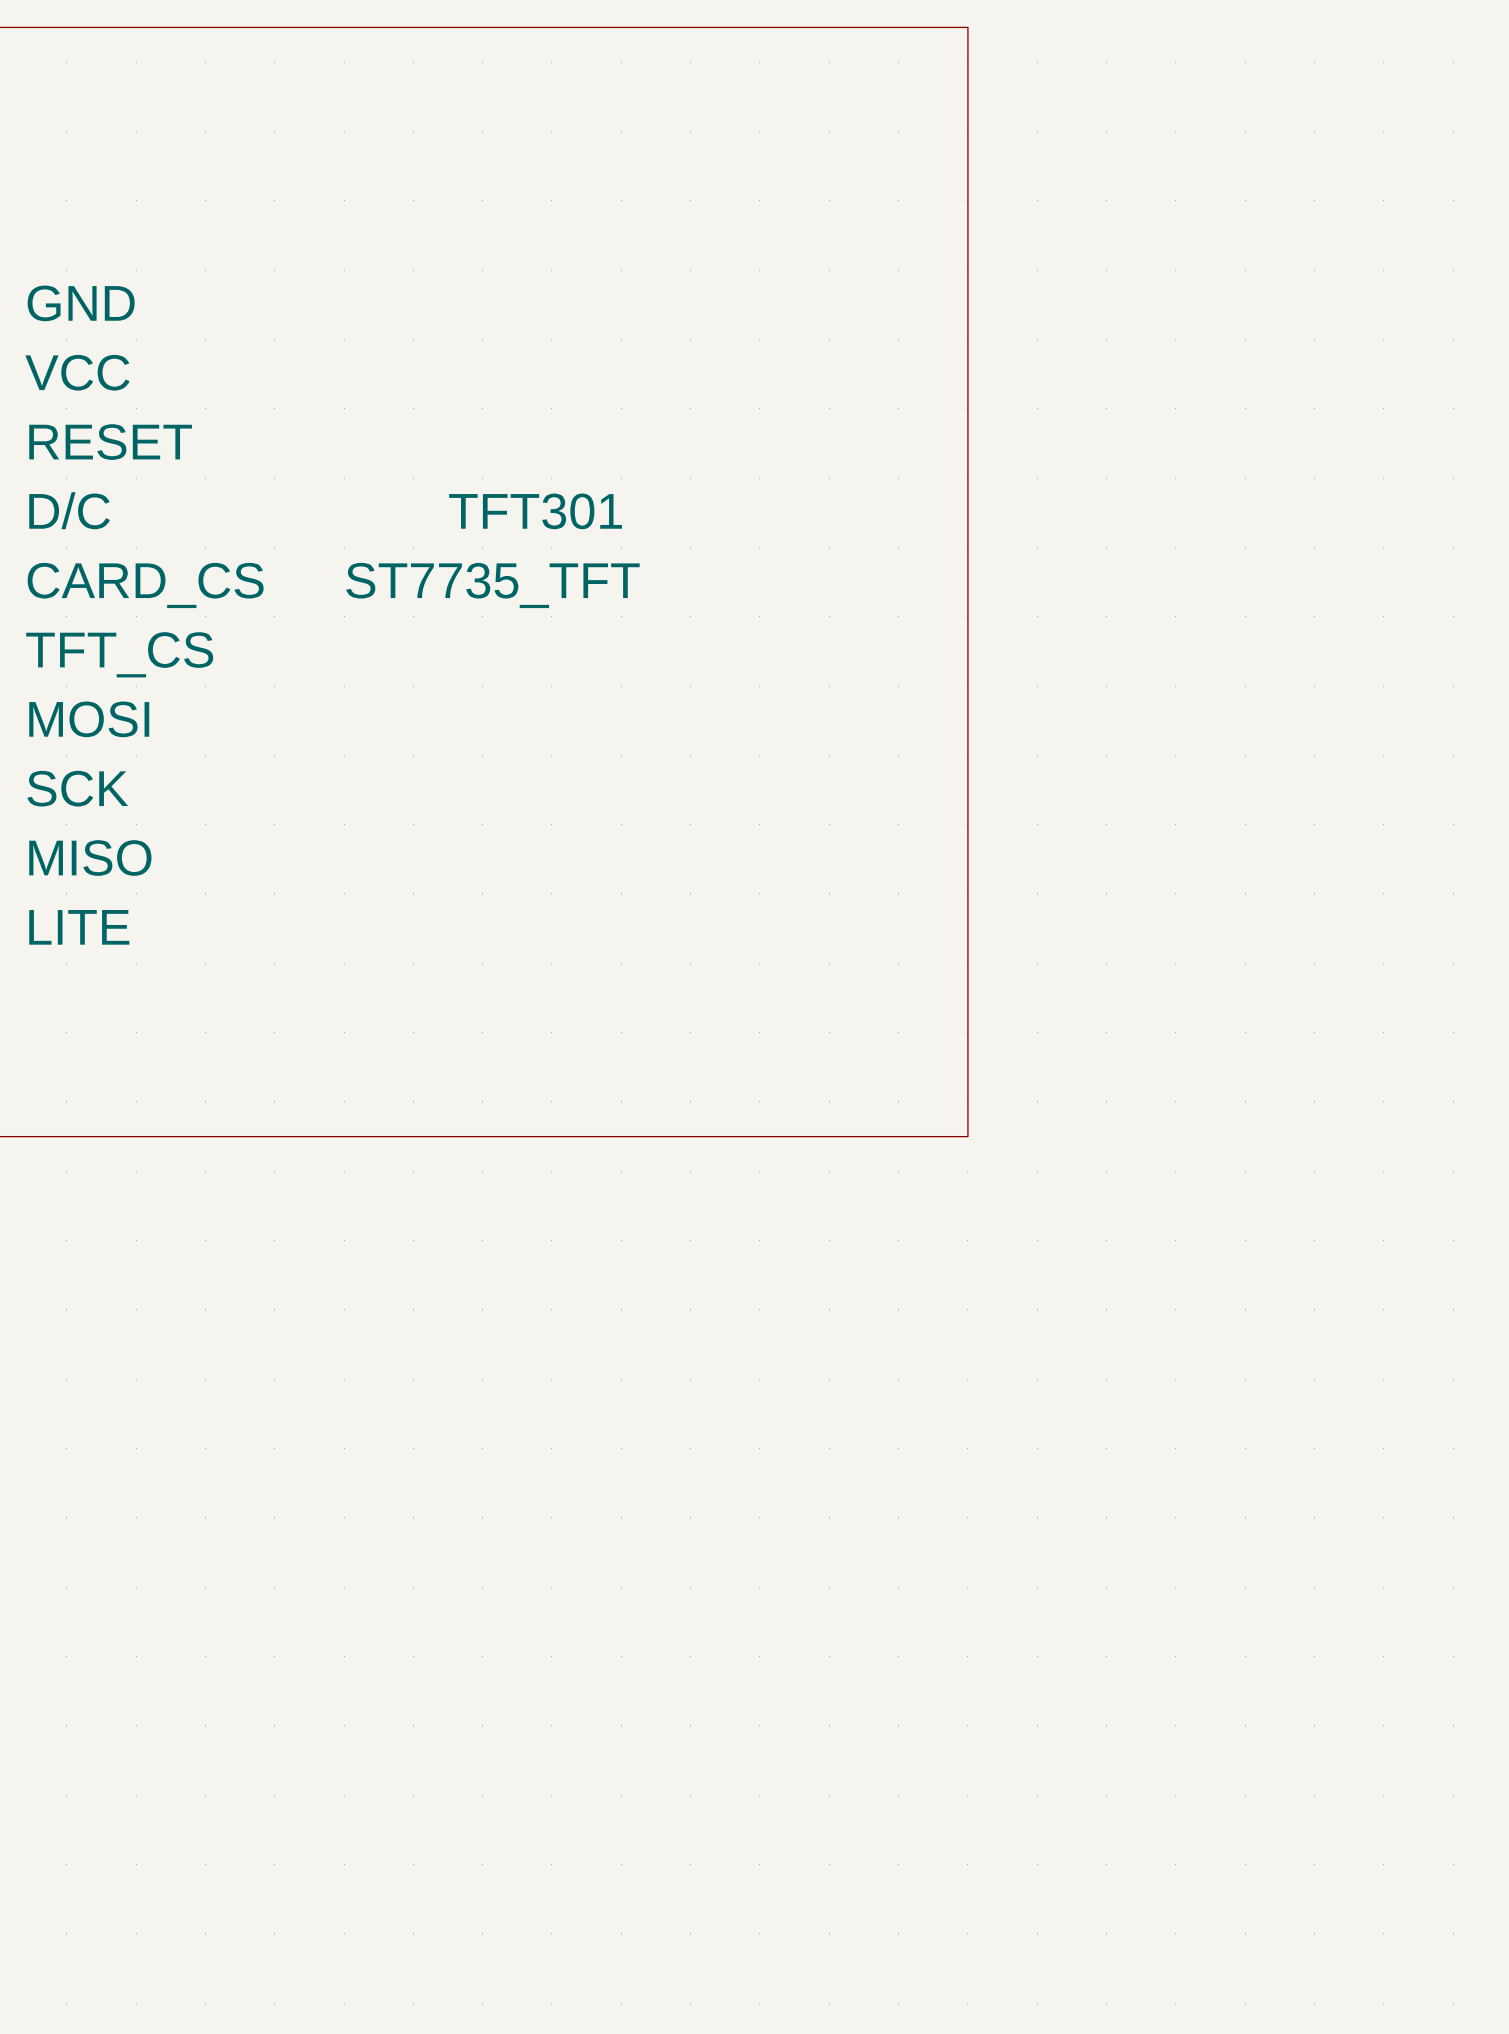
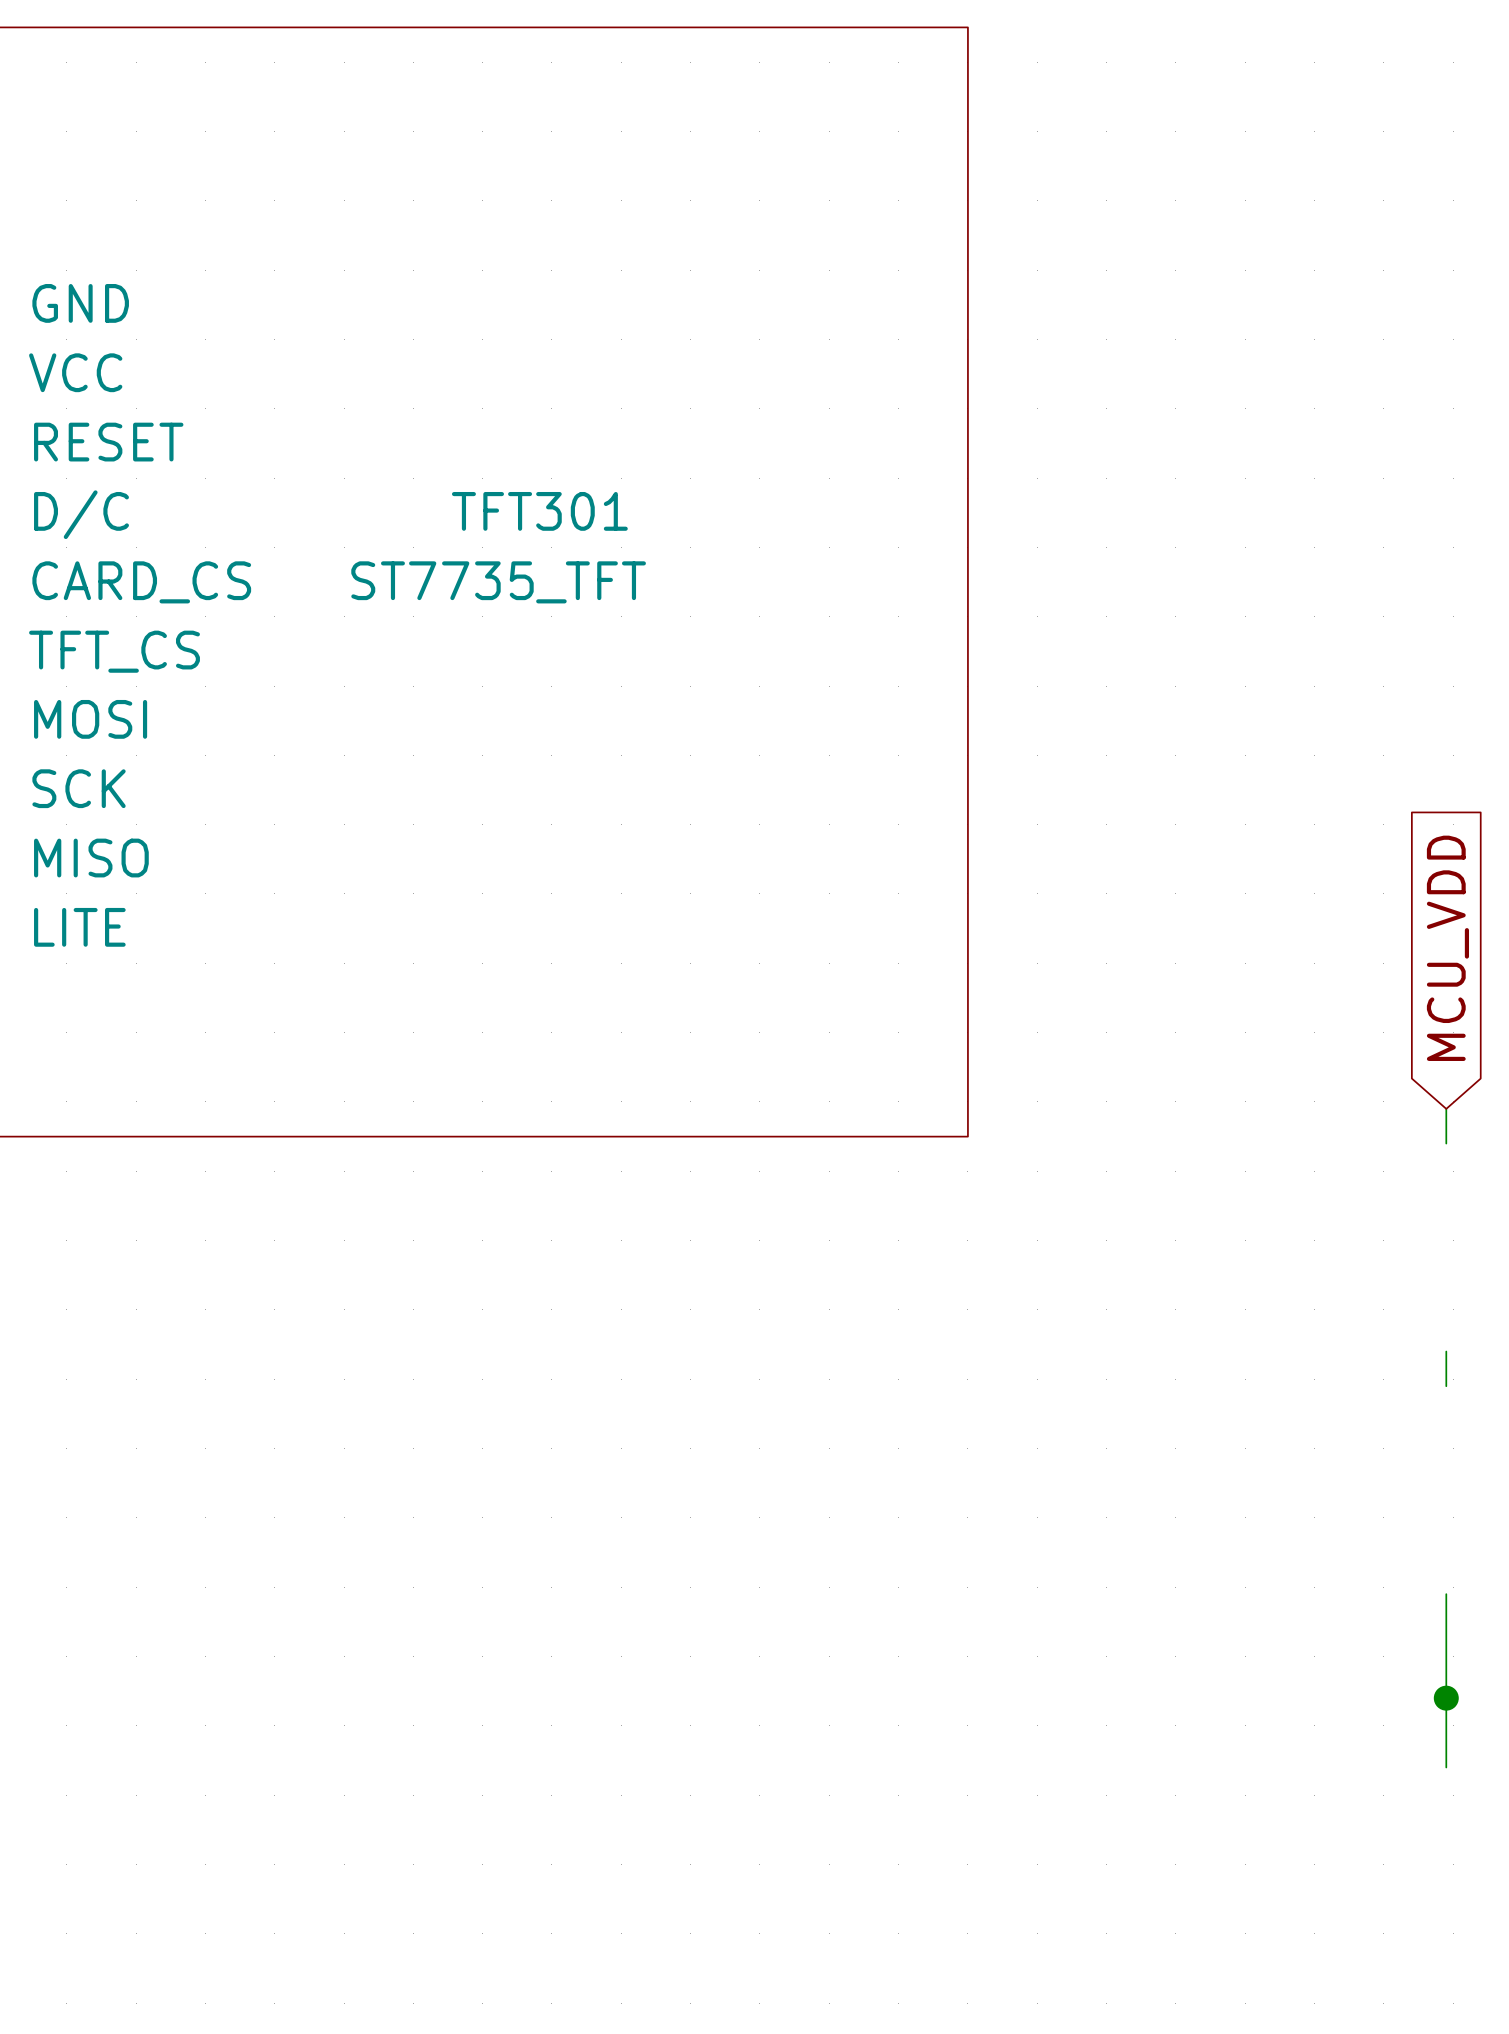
global label: none -> MCU_VDD (1447, 948)
wire: none -> (1446, 1108) (1446, 1143)
wire: none -> (1446, 1351) (1446, 1386)
wire: none -> (1446, 1594) (1446, 1767)
junction: none -> (1446, 1698)

